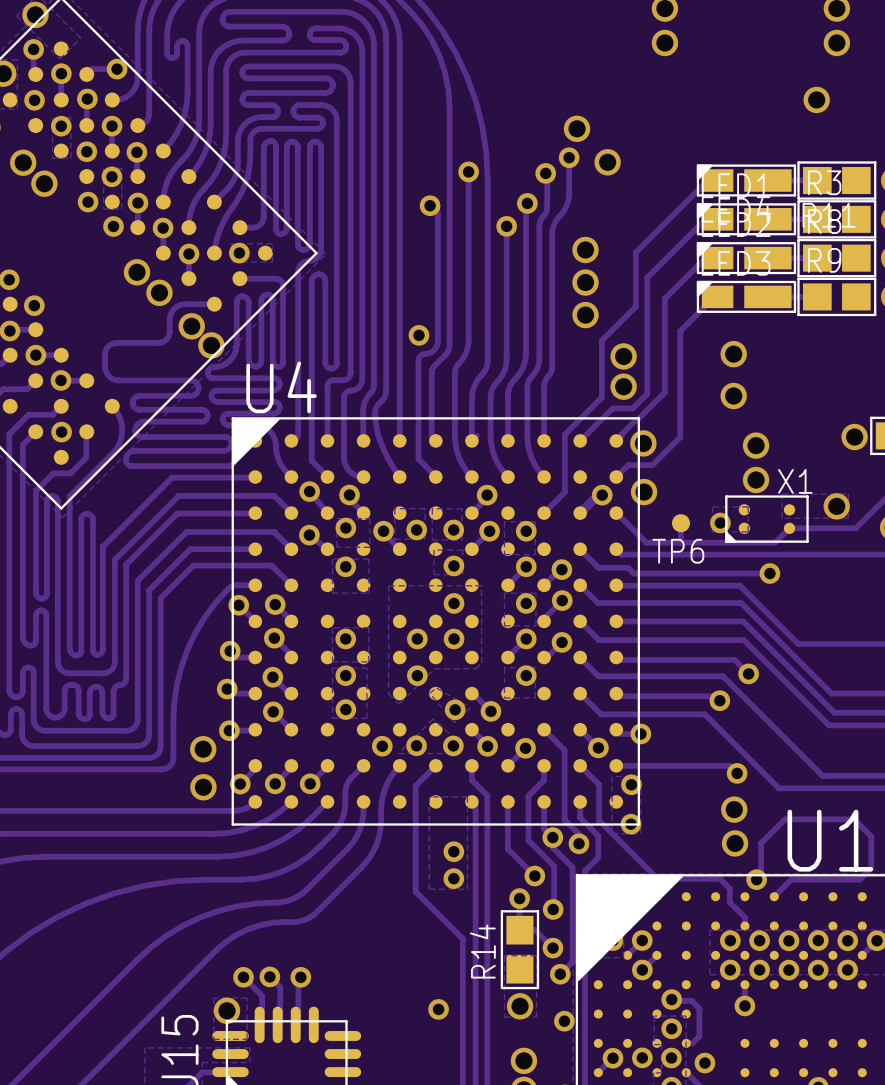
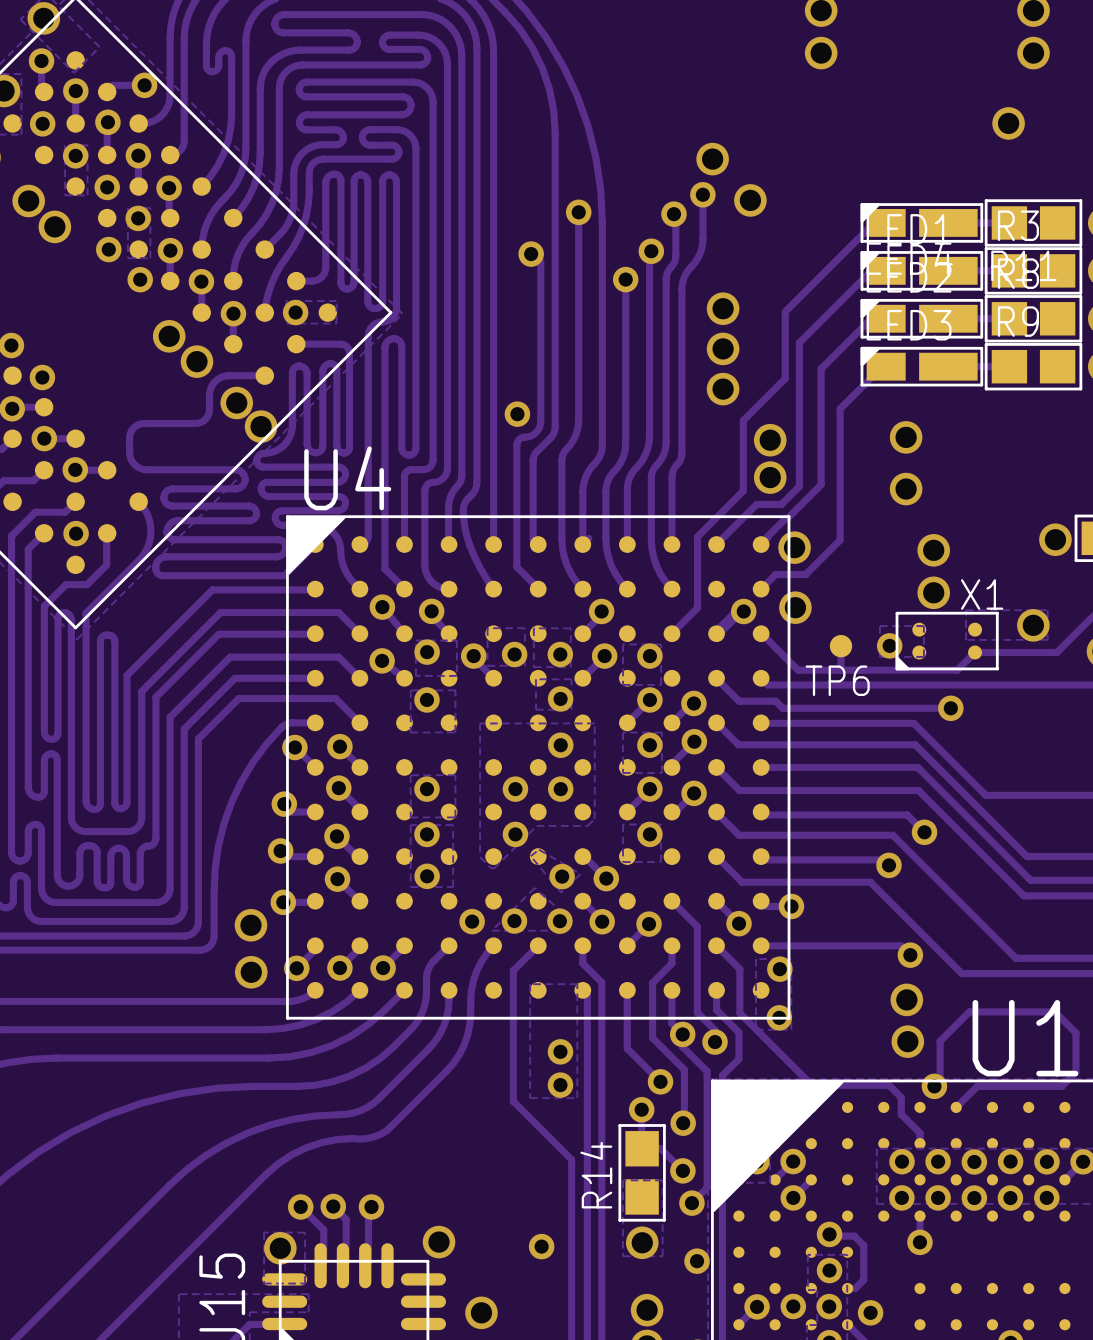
via: none -> (439, 1242)
via: none -> (481, 1312)

